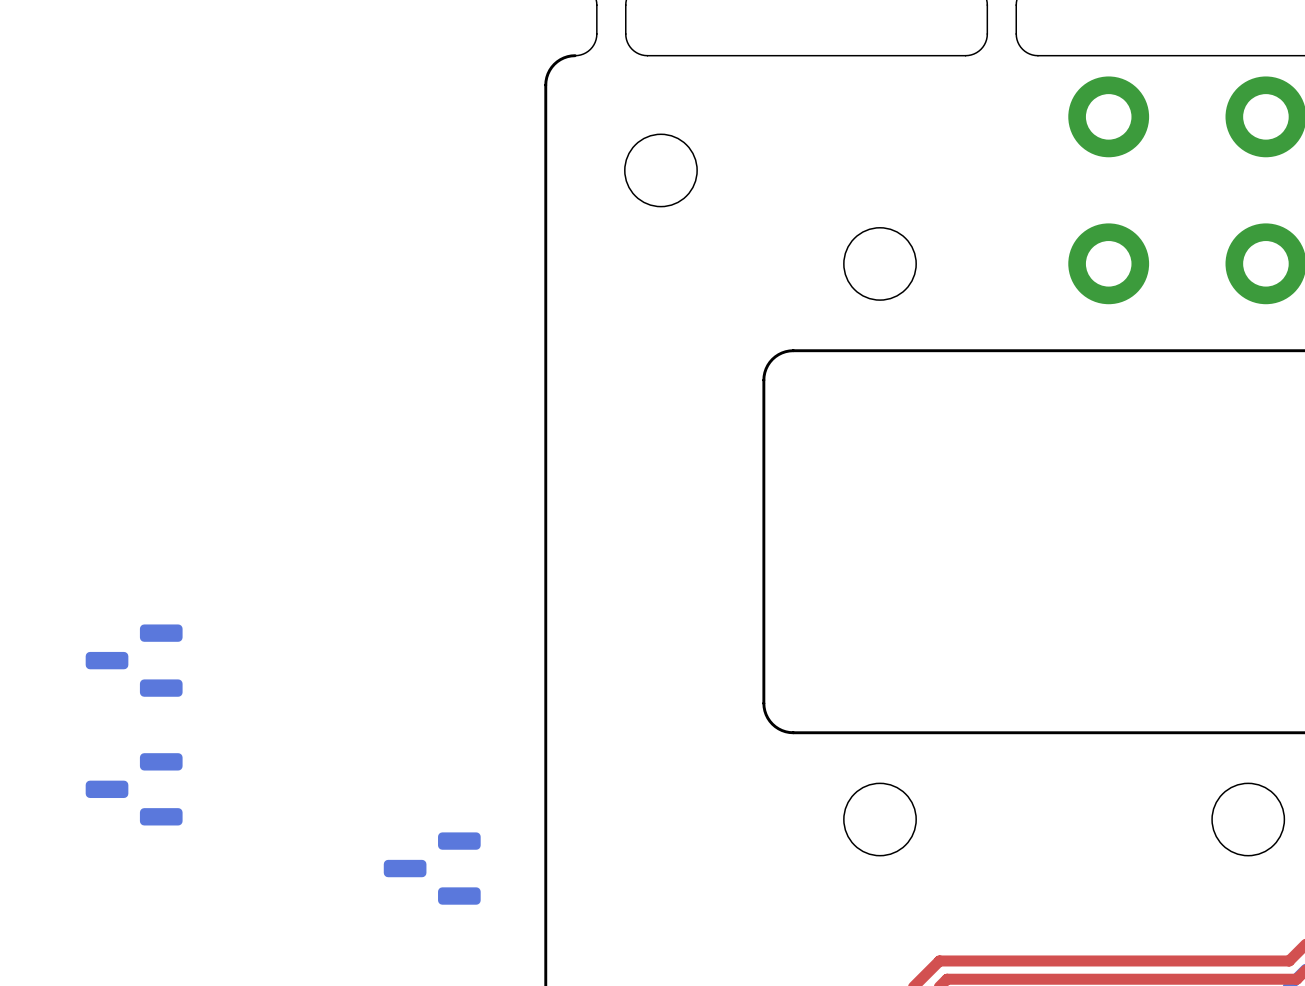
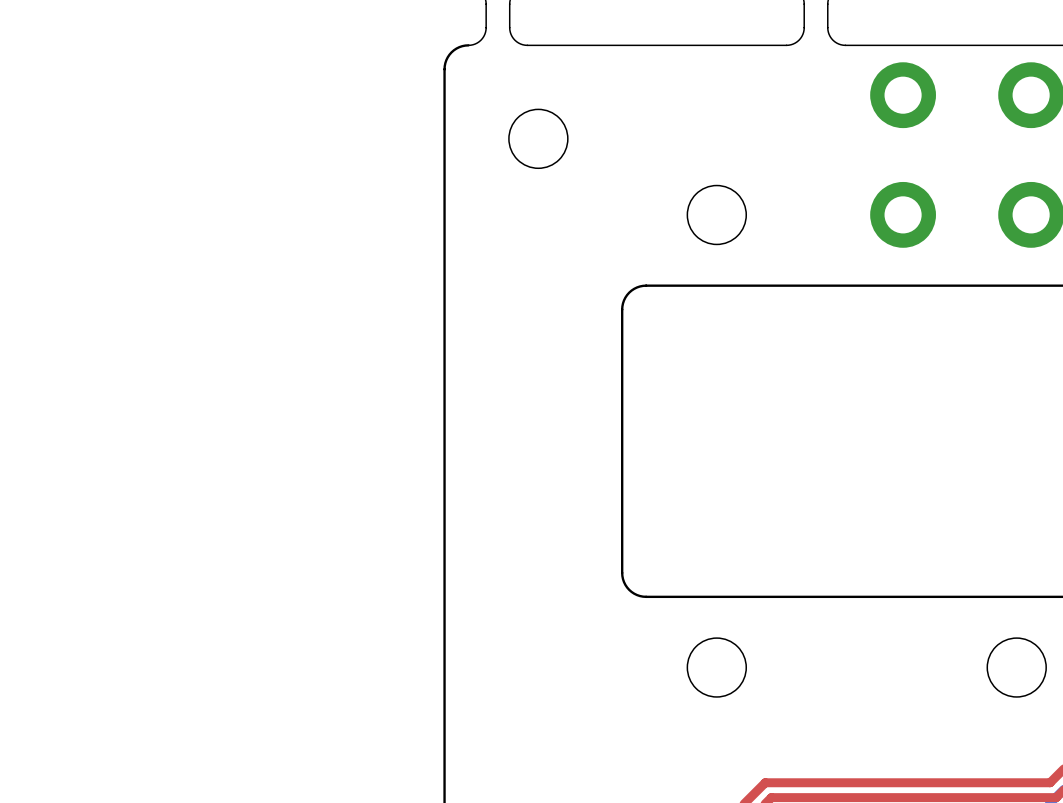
part: (134, 660) -> none
part: (134, 789) -> none
part: (432, 868) -> none

